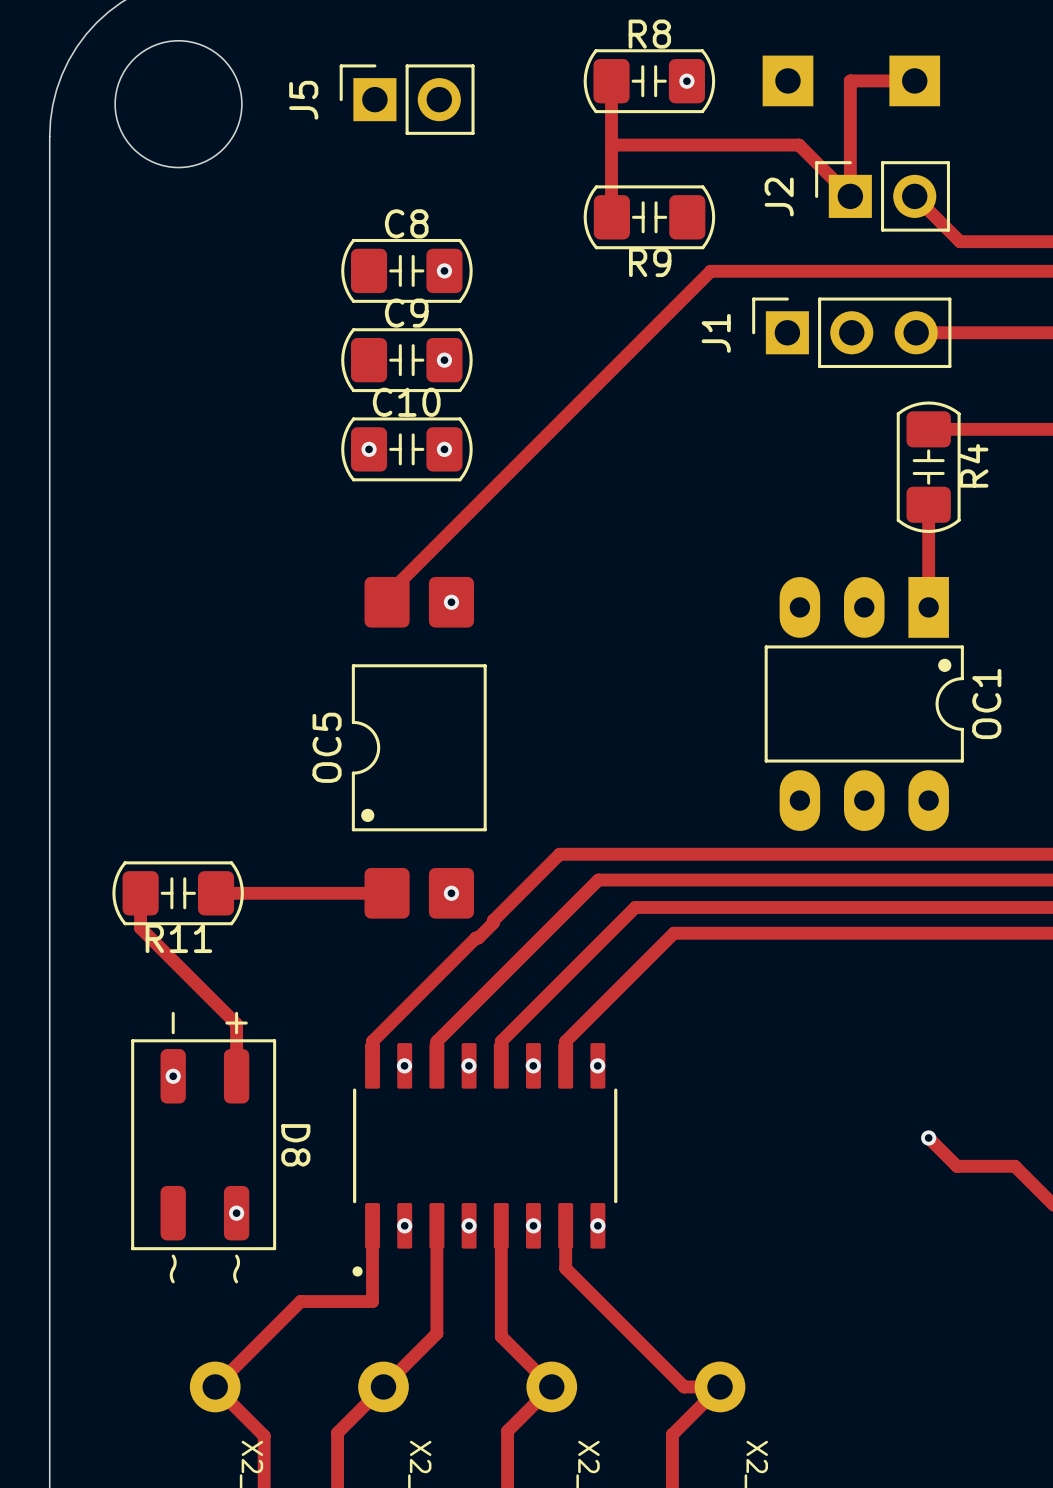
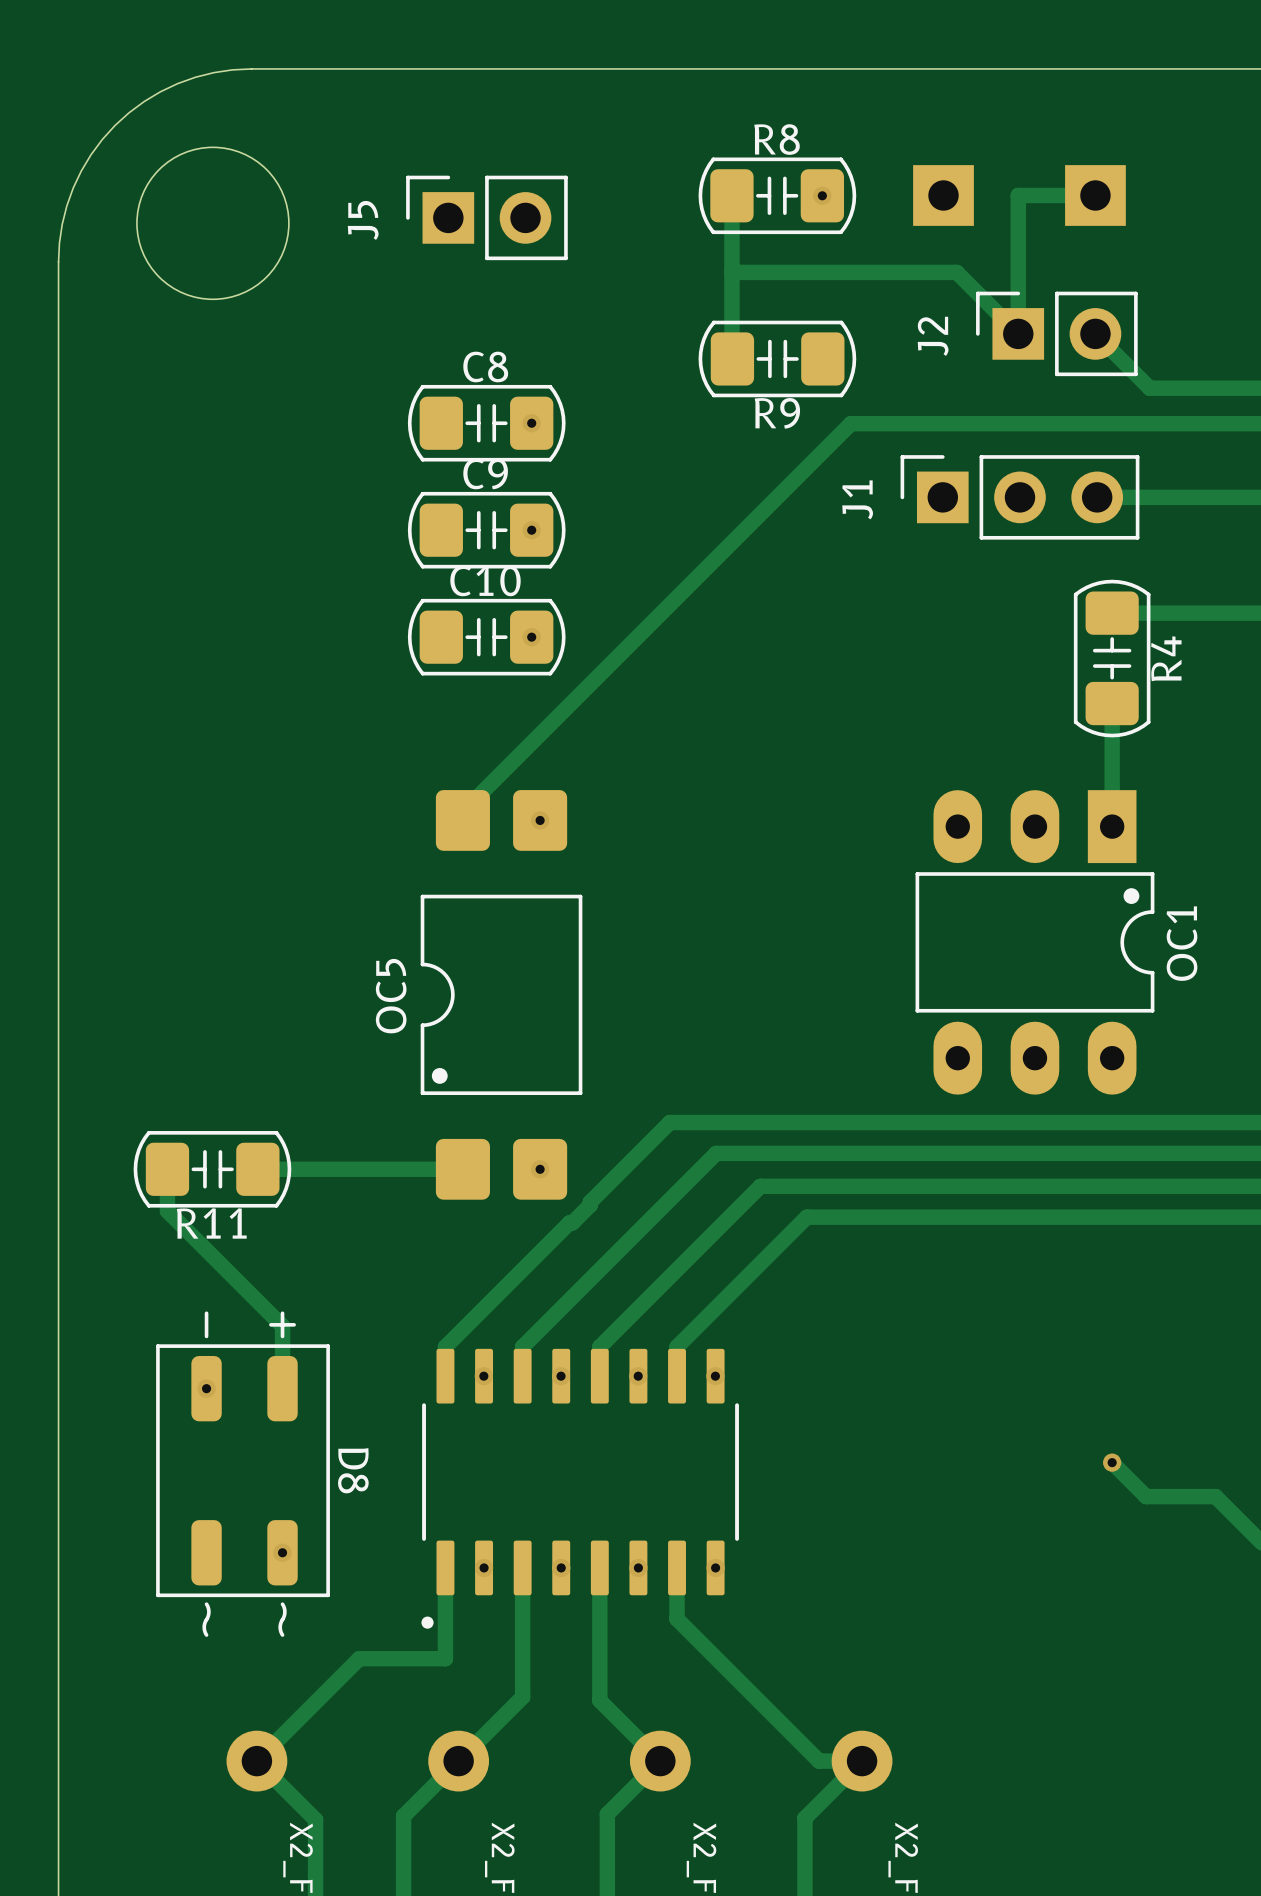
via: (369, 449) -> none

